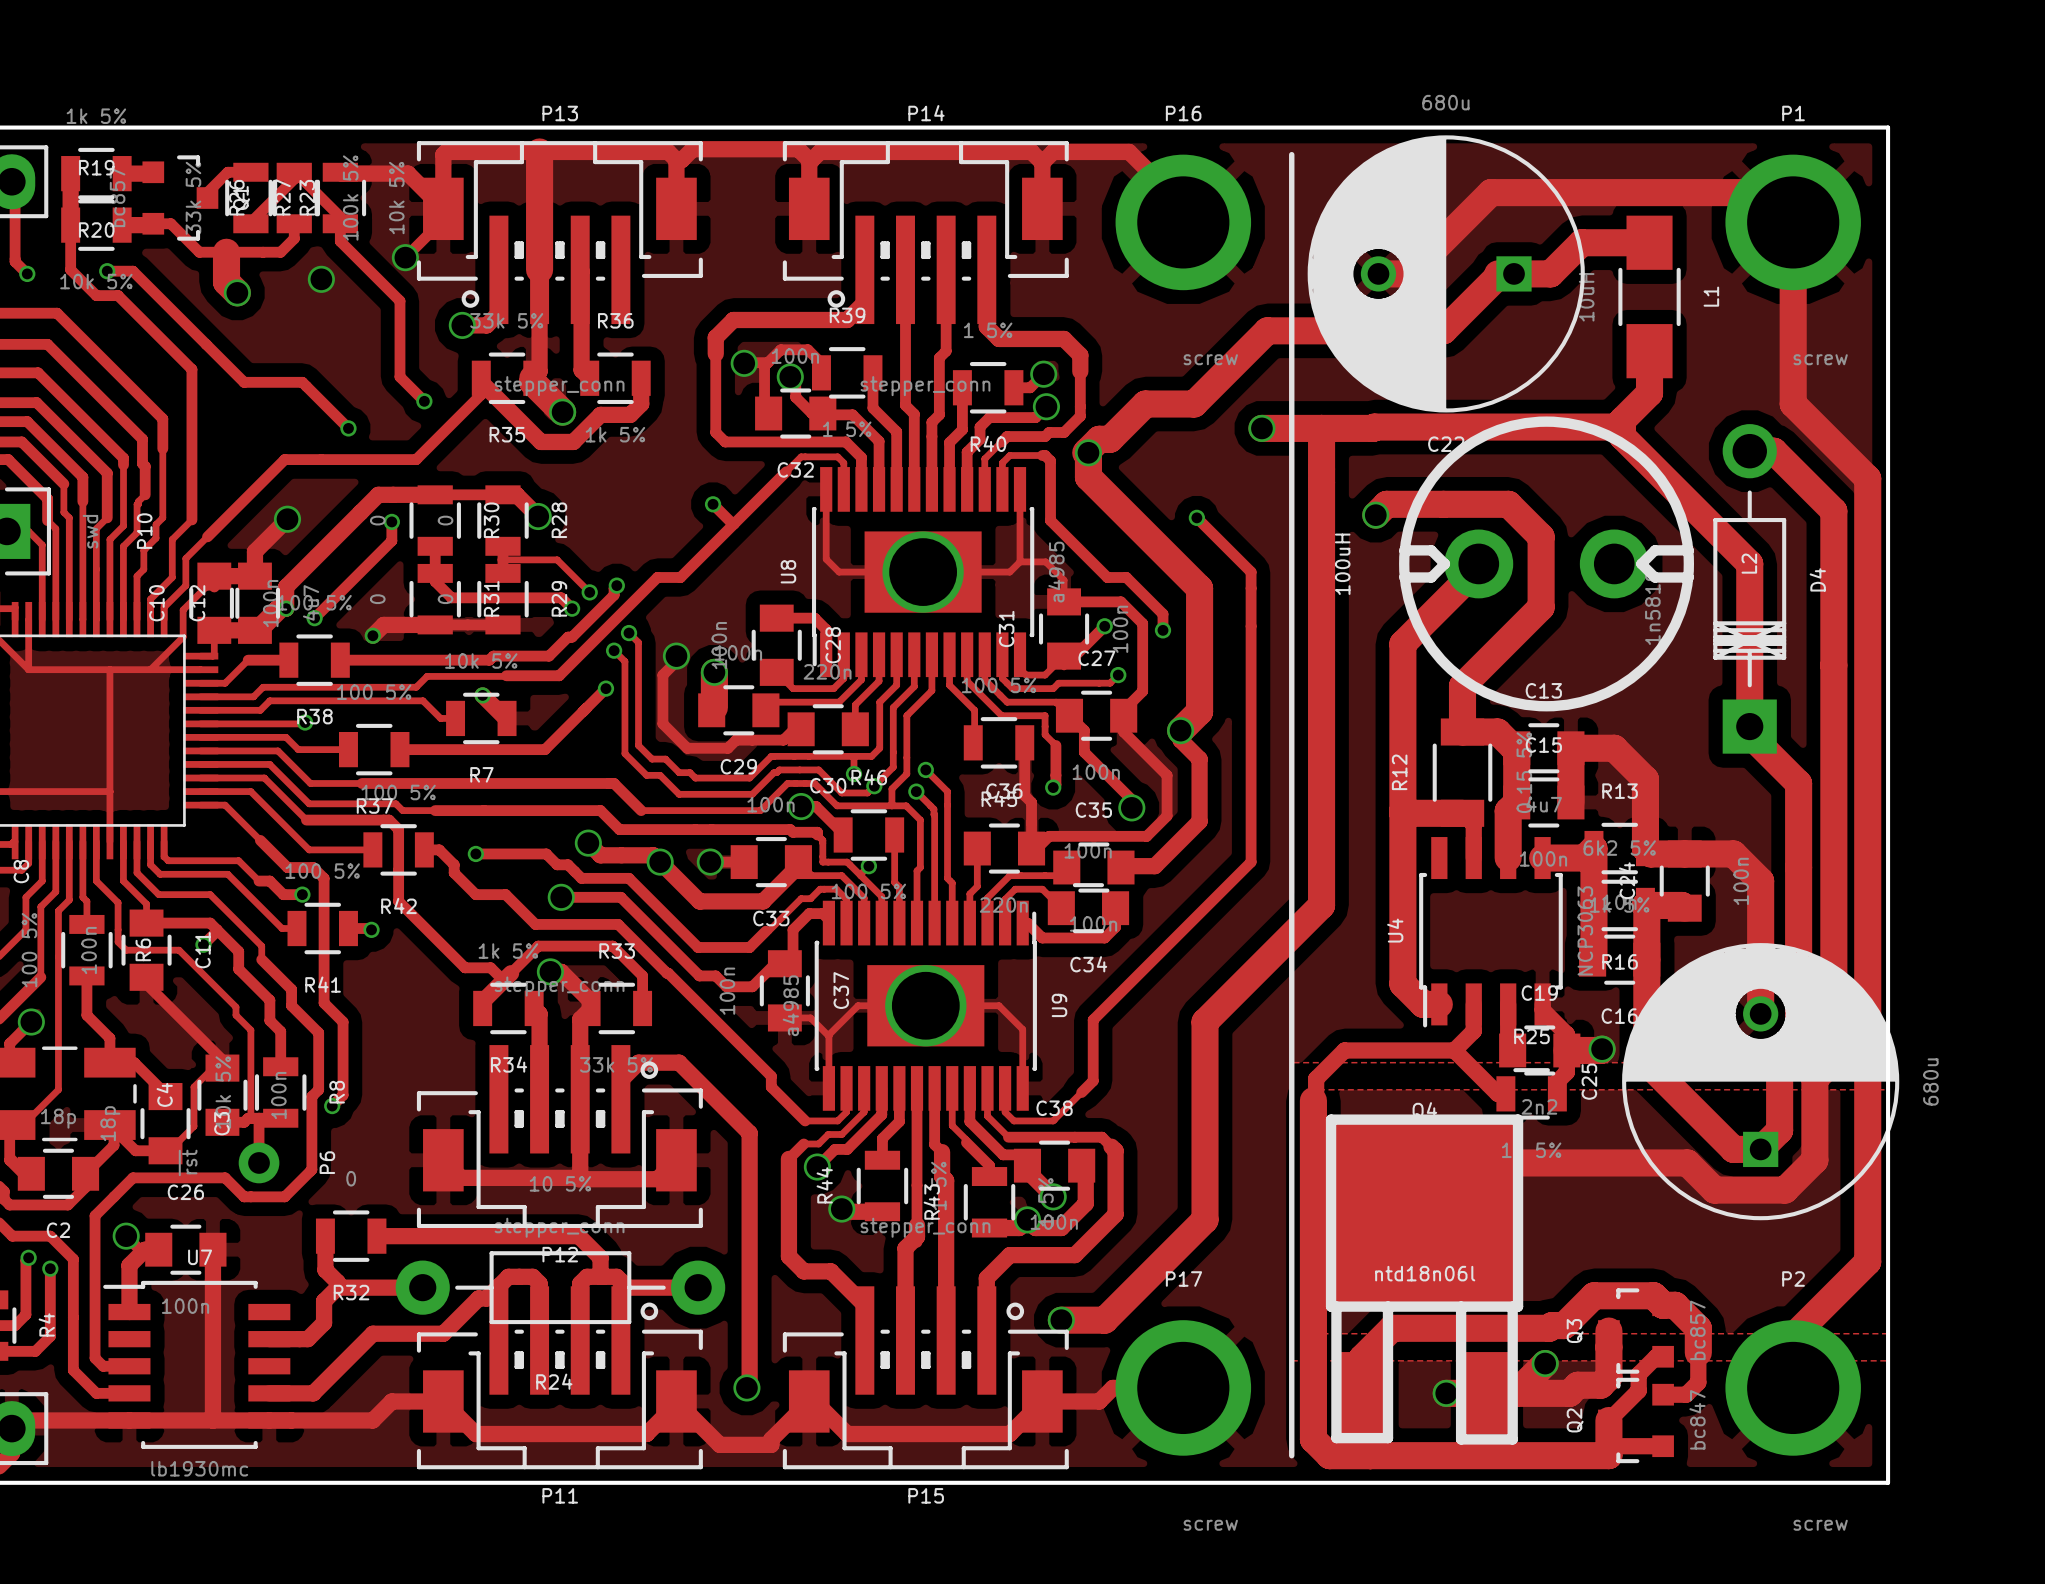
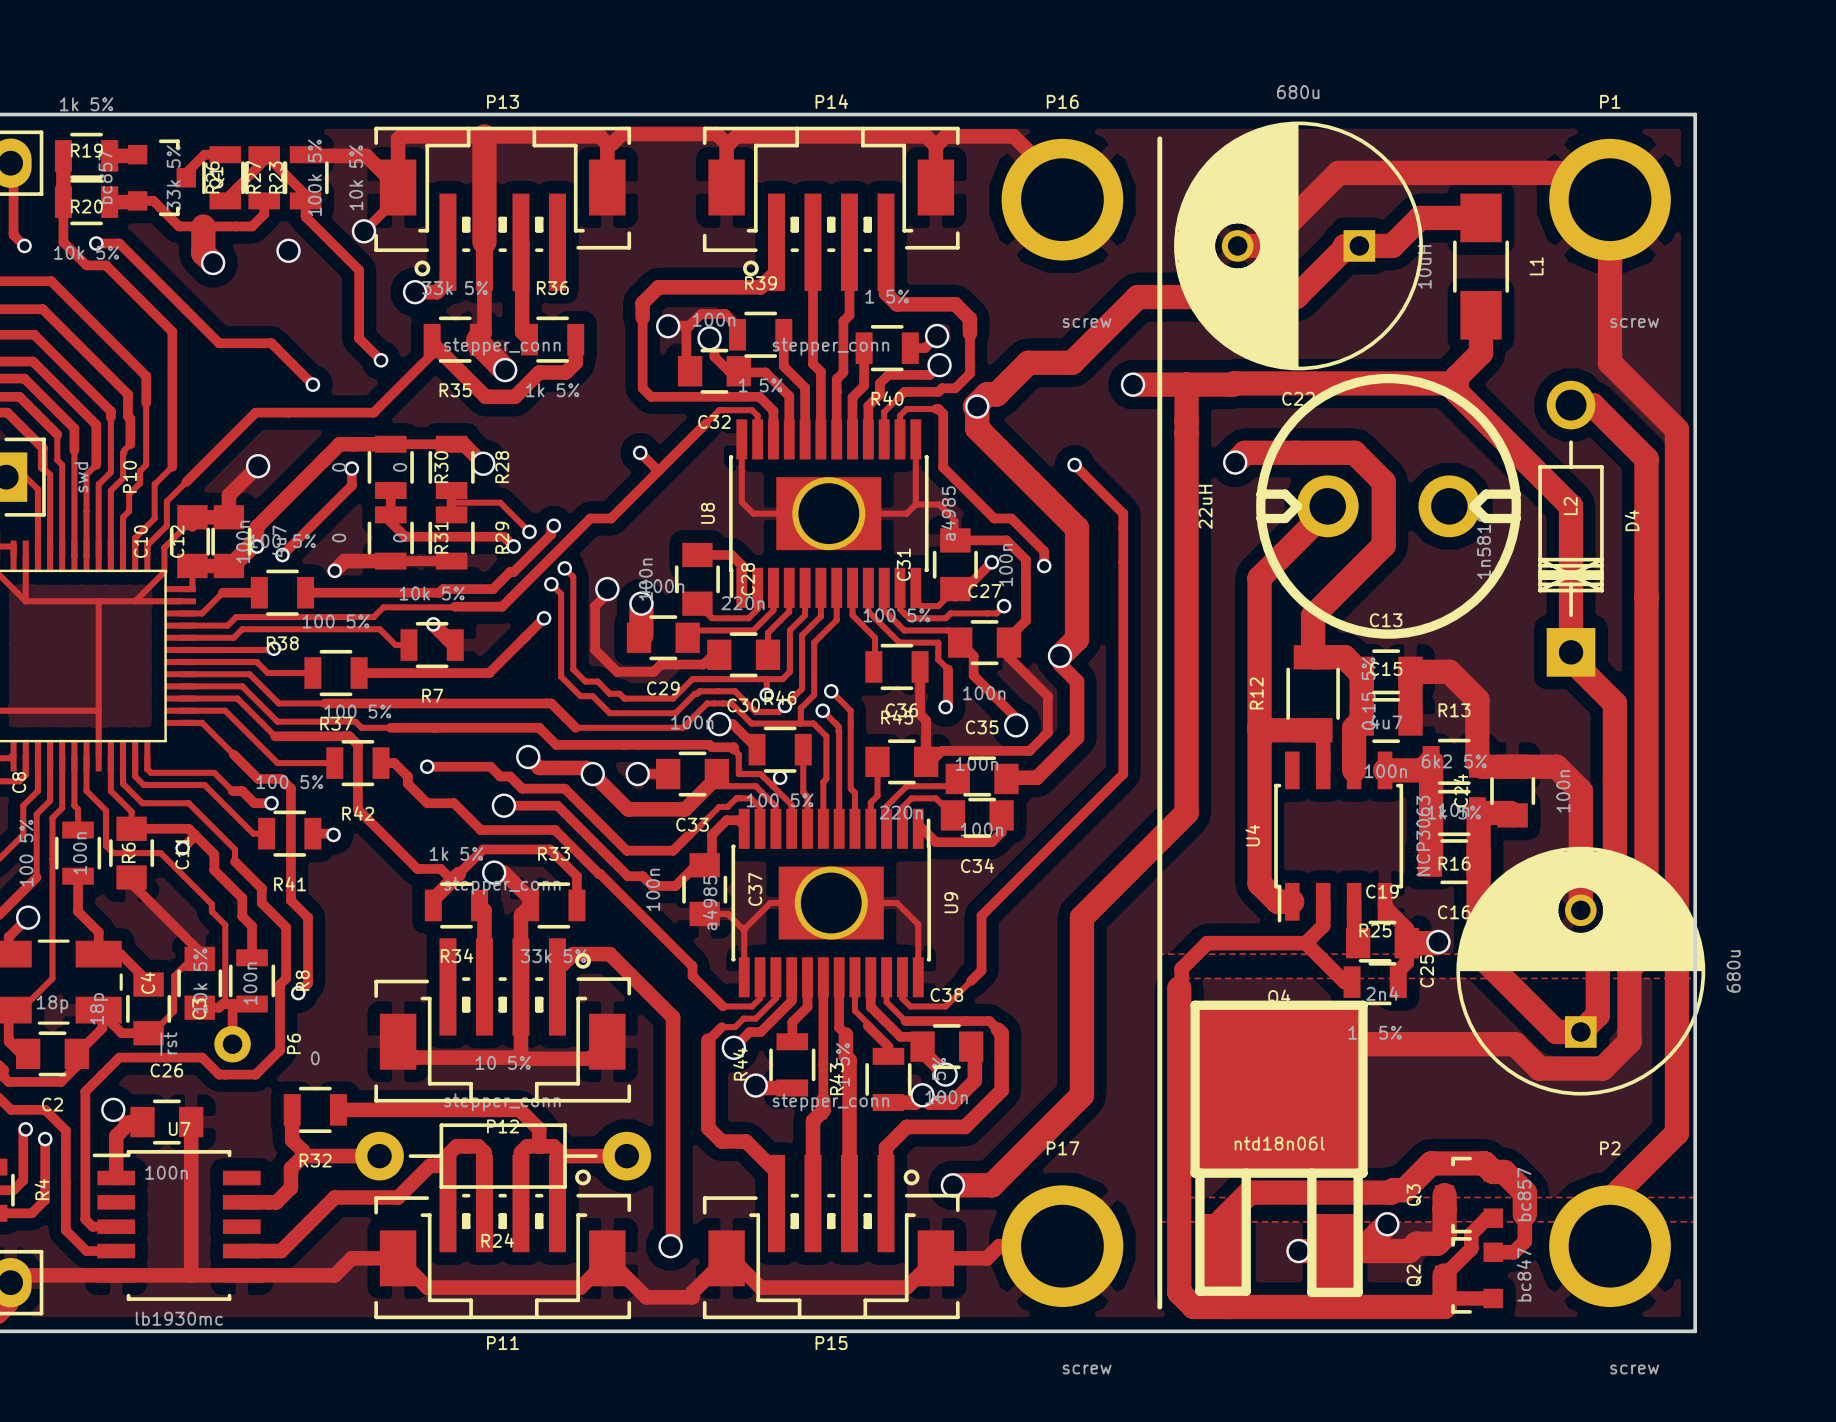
L2 value: 100uH (1342, 564) -> 22uH (1205, 506)
C19 value: 2n2 (1539, 1106) -> 2n4 (1382, 993)

